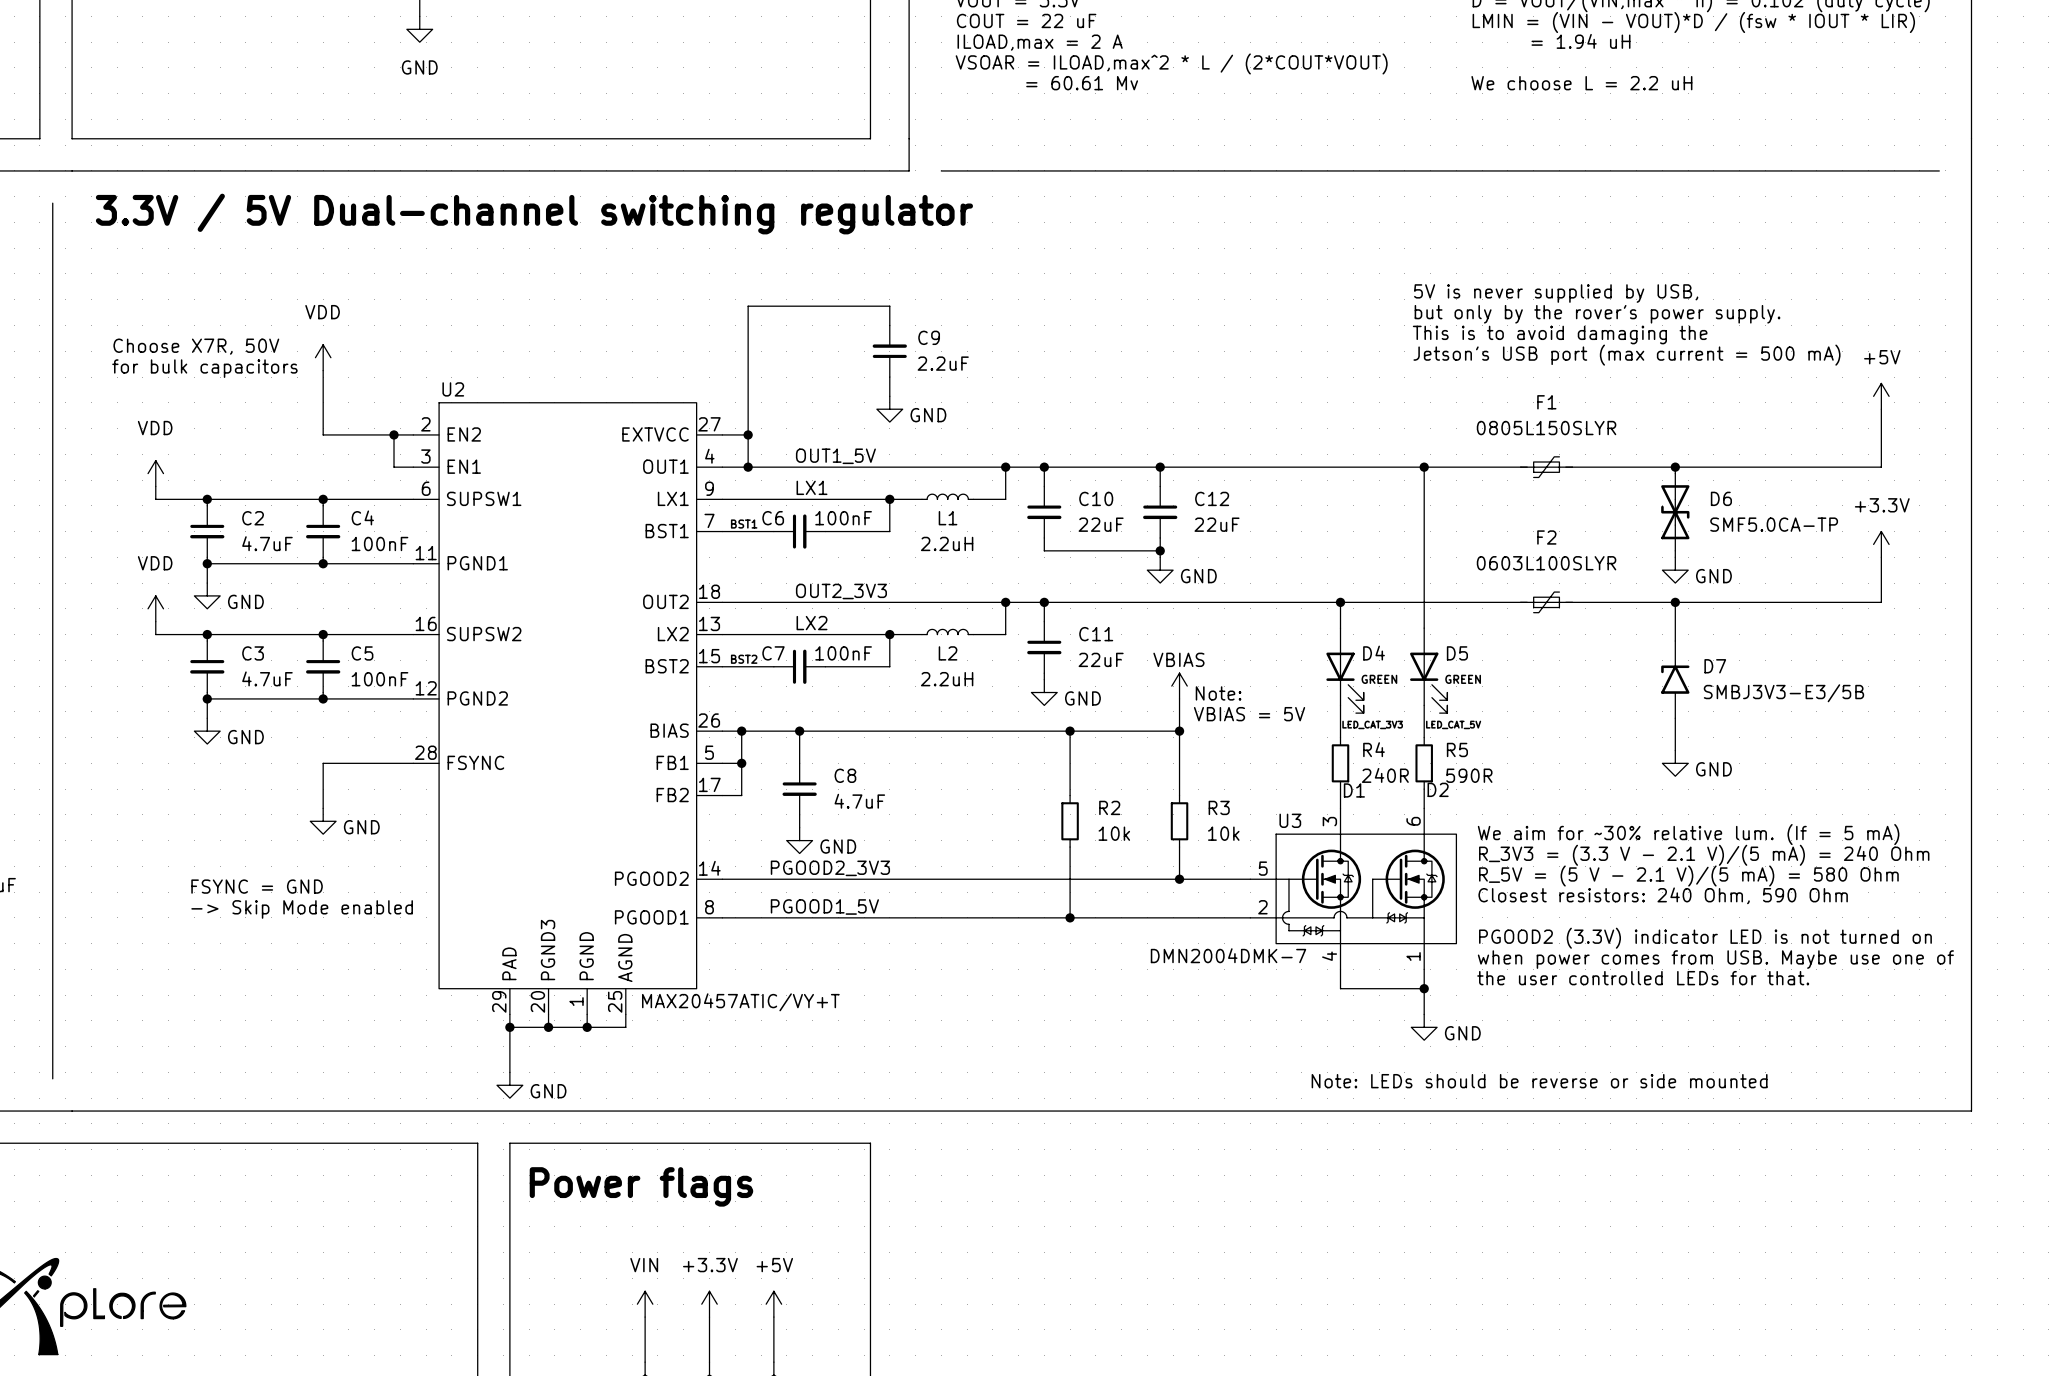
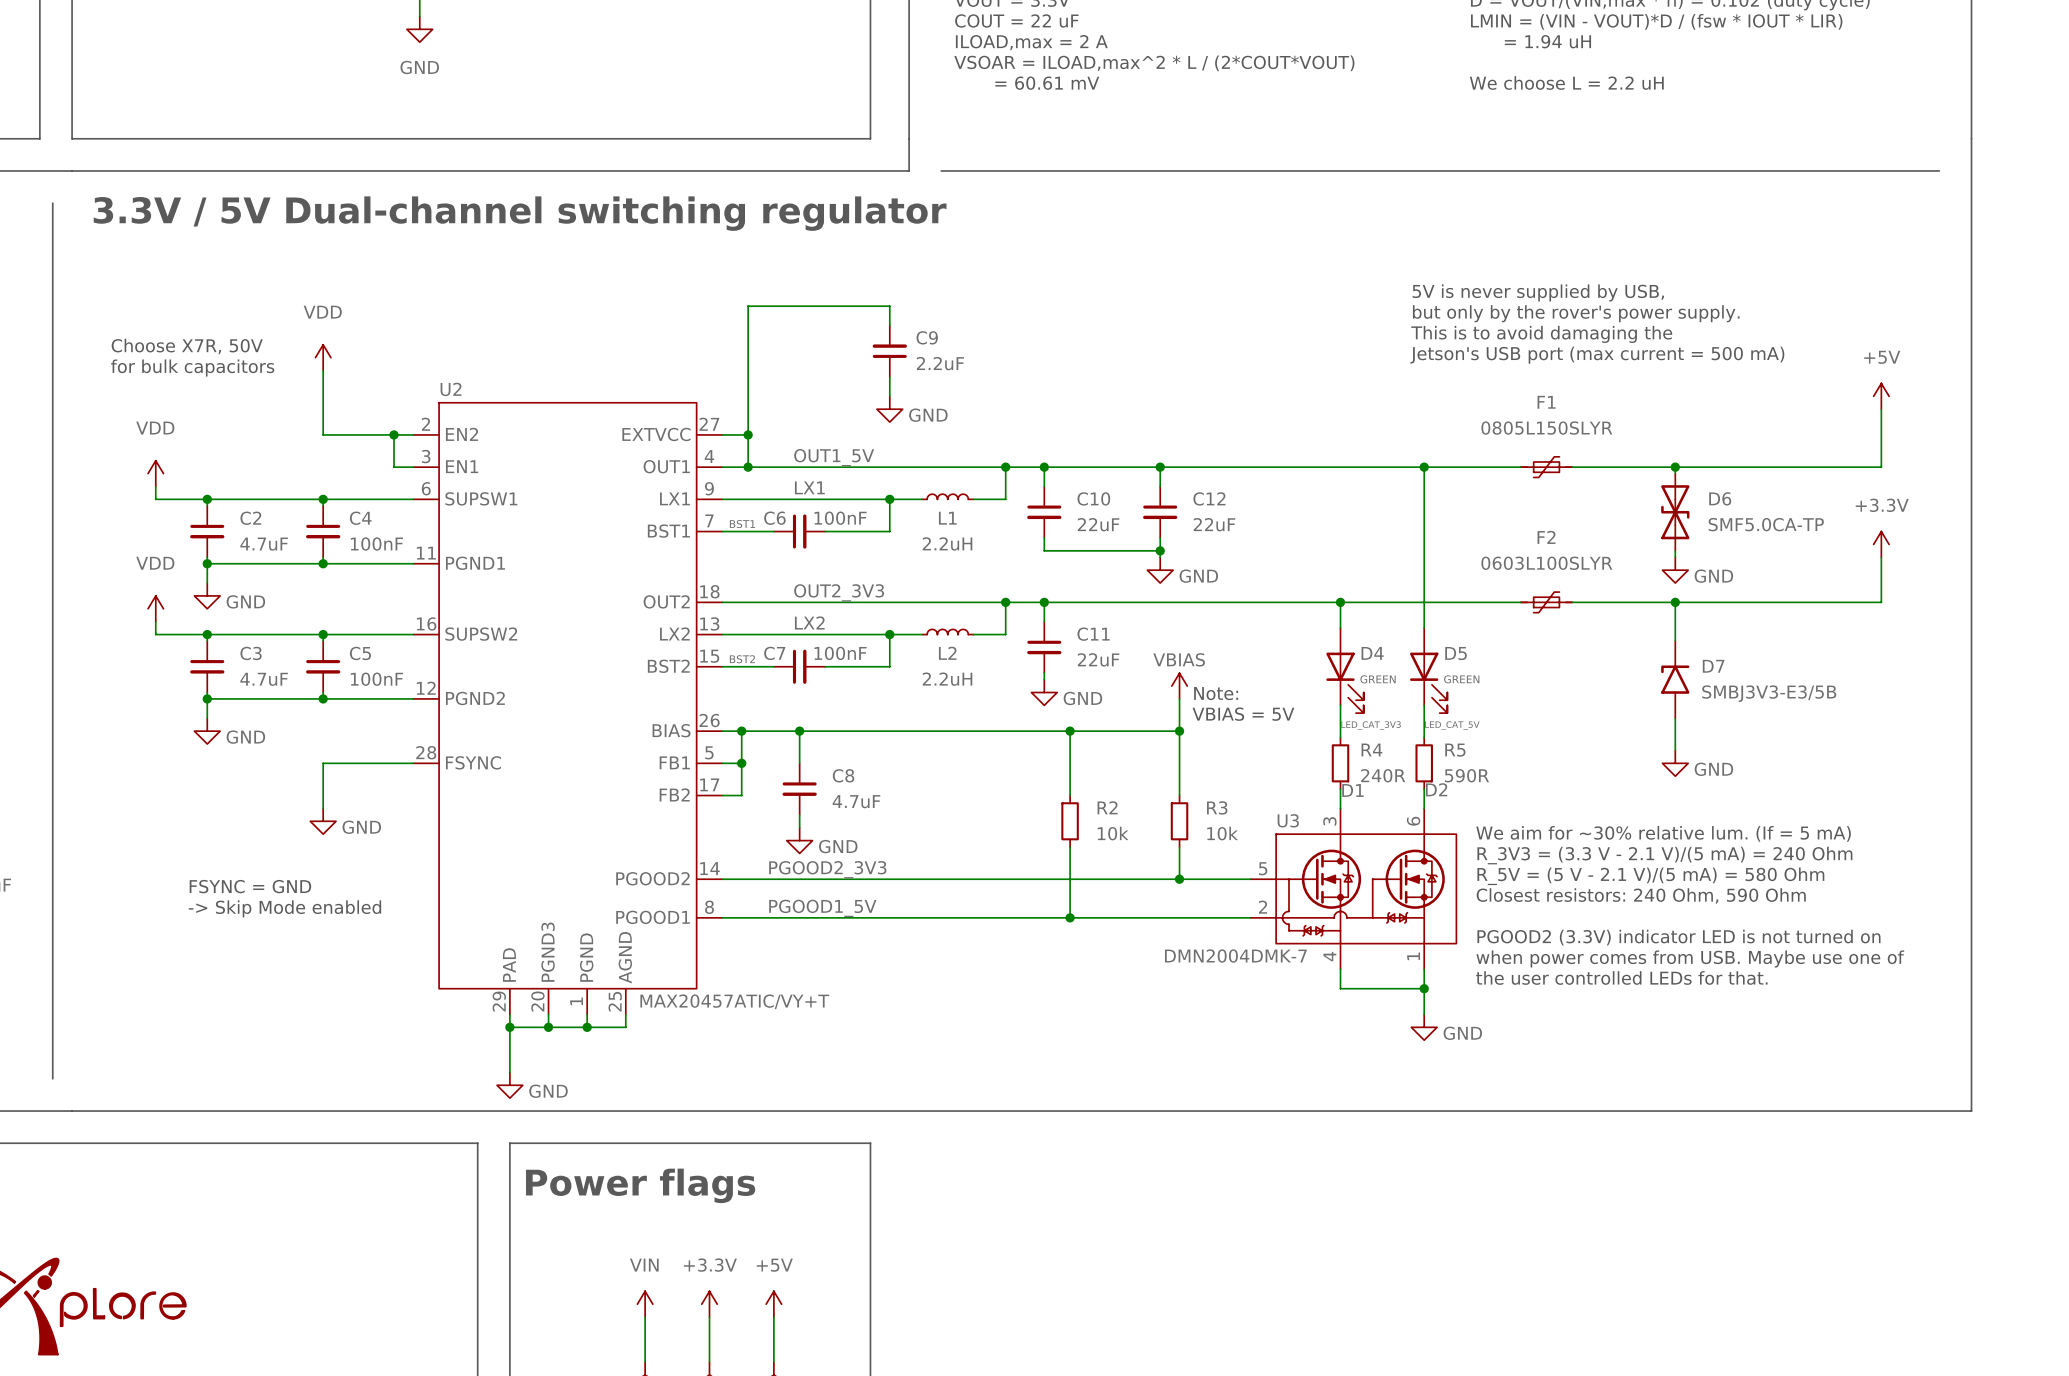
text: = 60.61 Mv (1082, 83) -> = 60.61 mV (1047, 83)
text: Note: LEDs should be reverse or side mounted (1539, 1081) -> none

